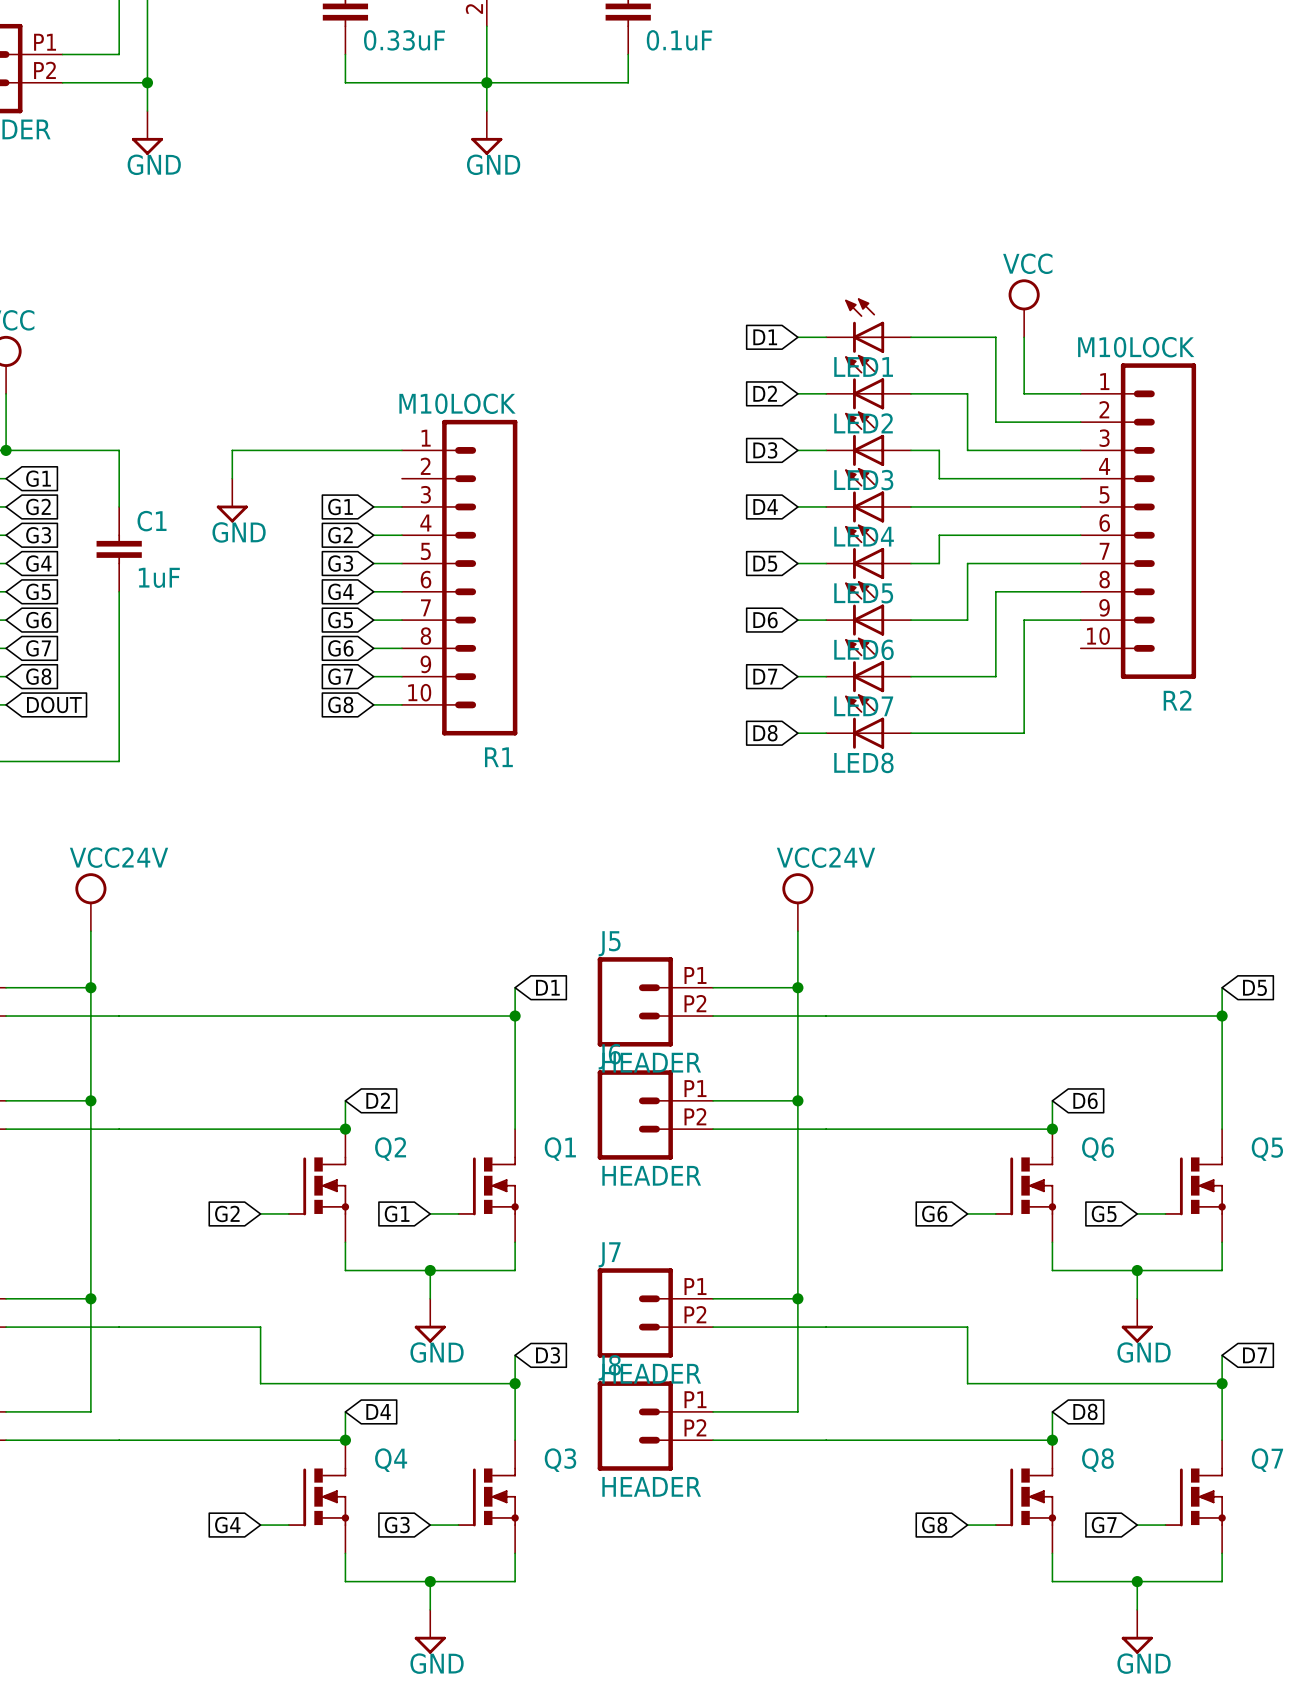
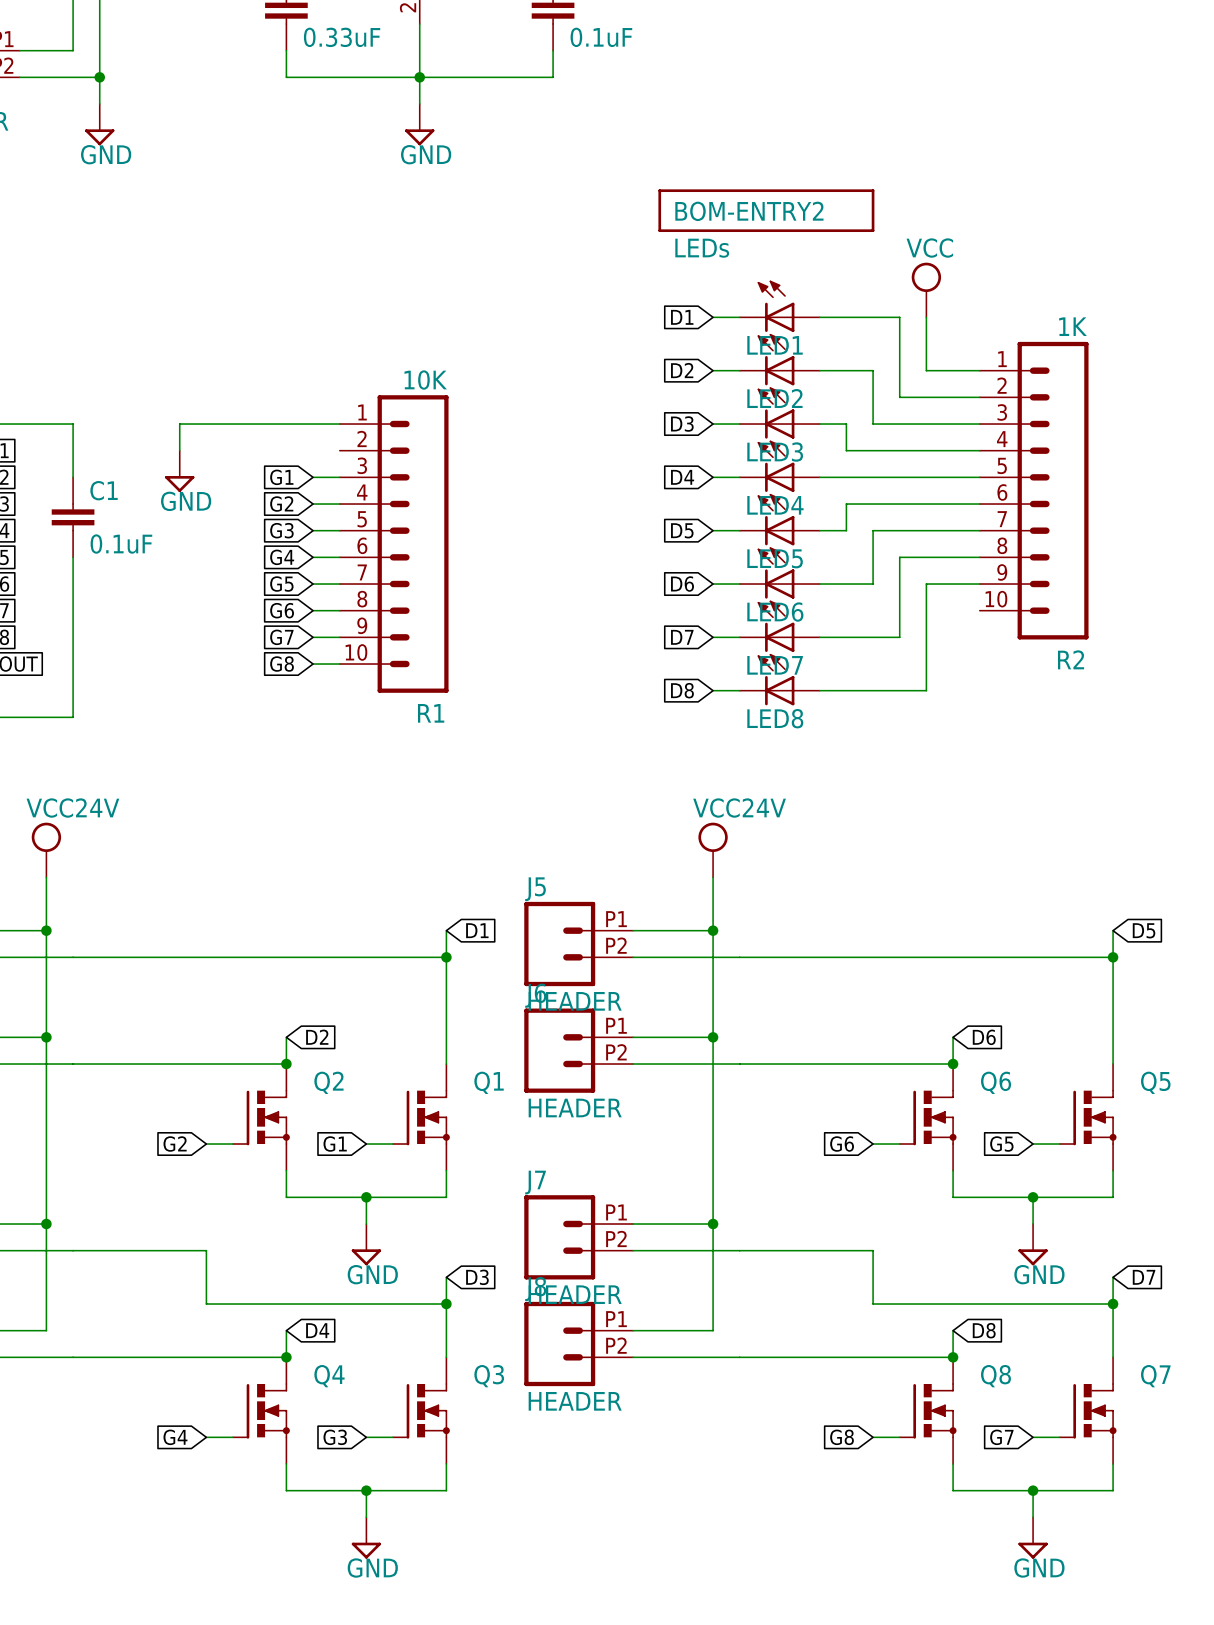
BOM-ENTRY2: none -> LEDs (766, 210)
R2 value: M10LOCK (1136, 347) -> 1K (1073, 326)
R1 value: M10LOCK (457, 403) -> 10K (425, 380)
C1 value: 1uF (159, 577) -> 0.1uF (121, 544)

